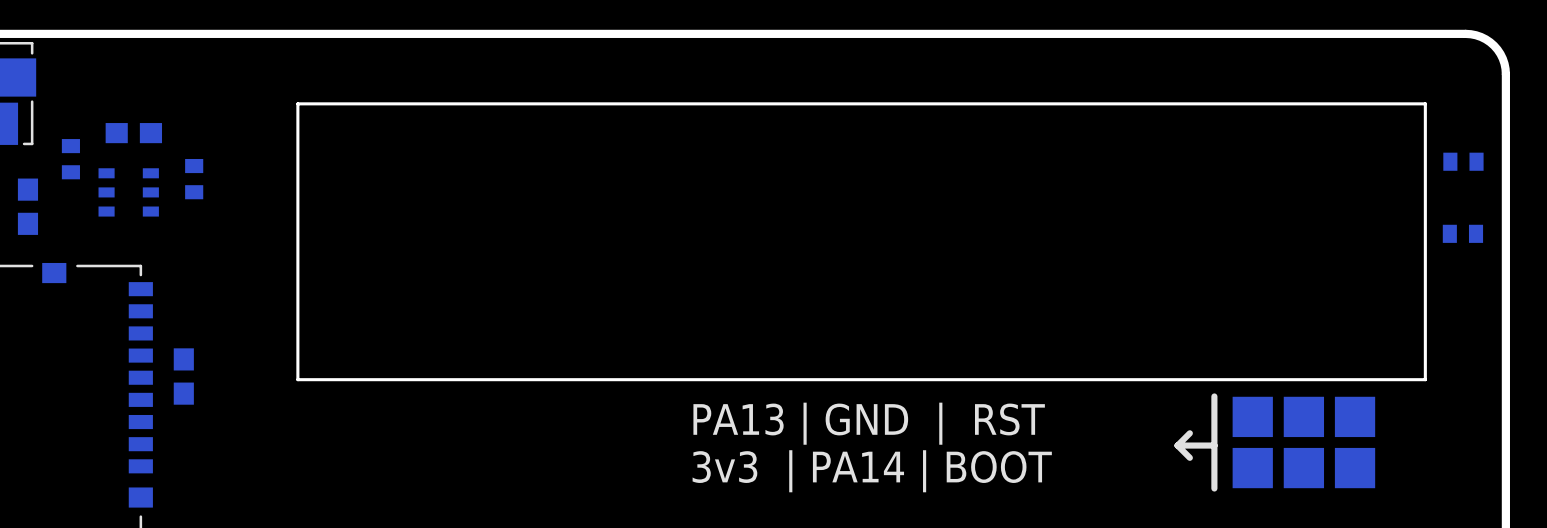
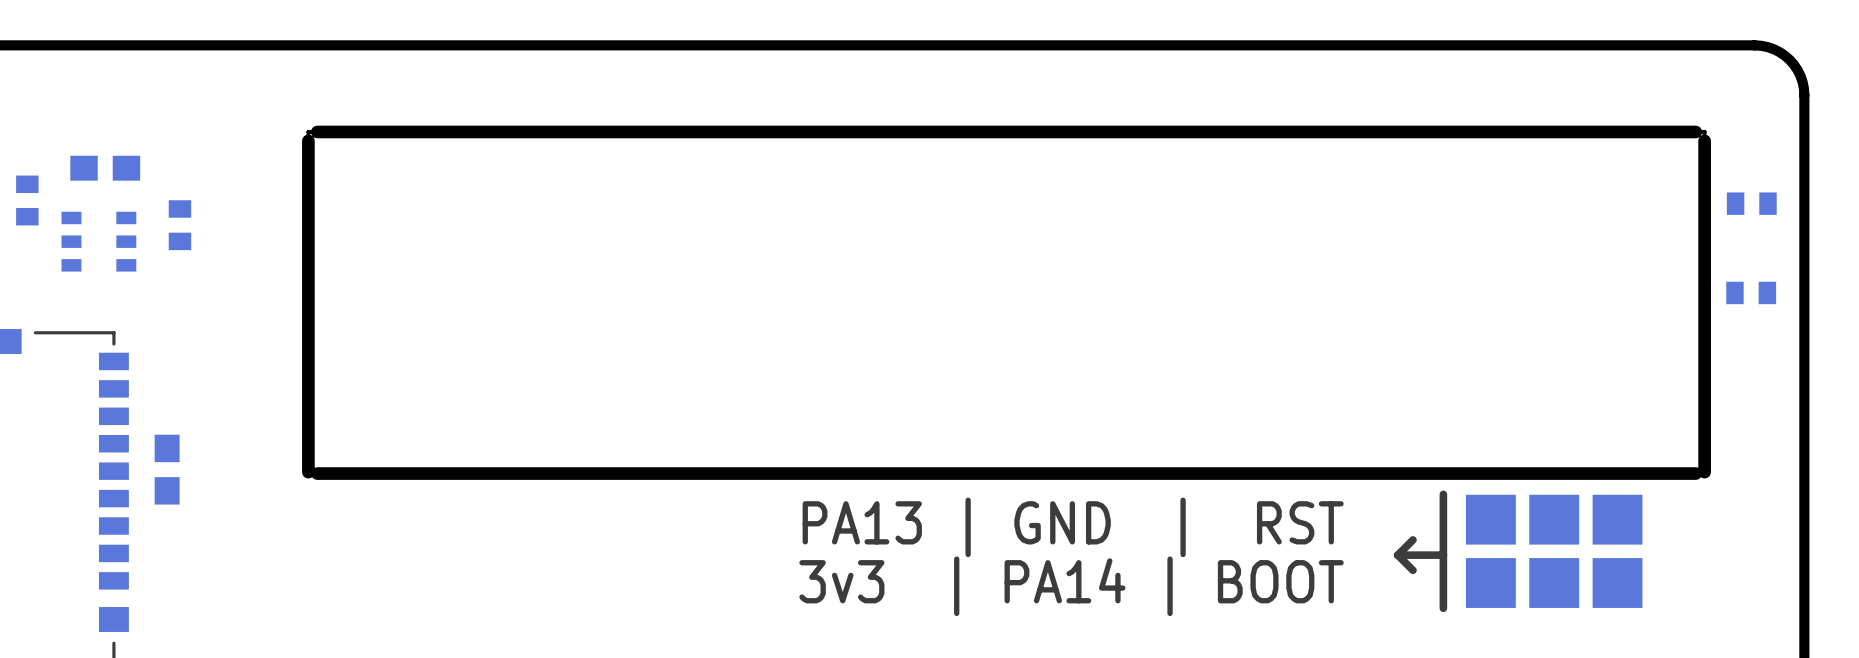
board edge width: thin (1418, 103) (305, 103) -> thick (1695, 131) (317, 131)
board edge width: thin (297, 111) (297, 378) -> thick (308, 140) (308, 472)
board edge width: thin (1425, 111) (1425, 378) -> thick (1704, 140) (1704, 472)
board edge width: thin (1418, 379) (305, 379) -> thick (1695, 473) (317, 473)

